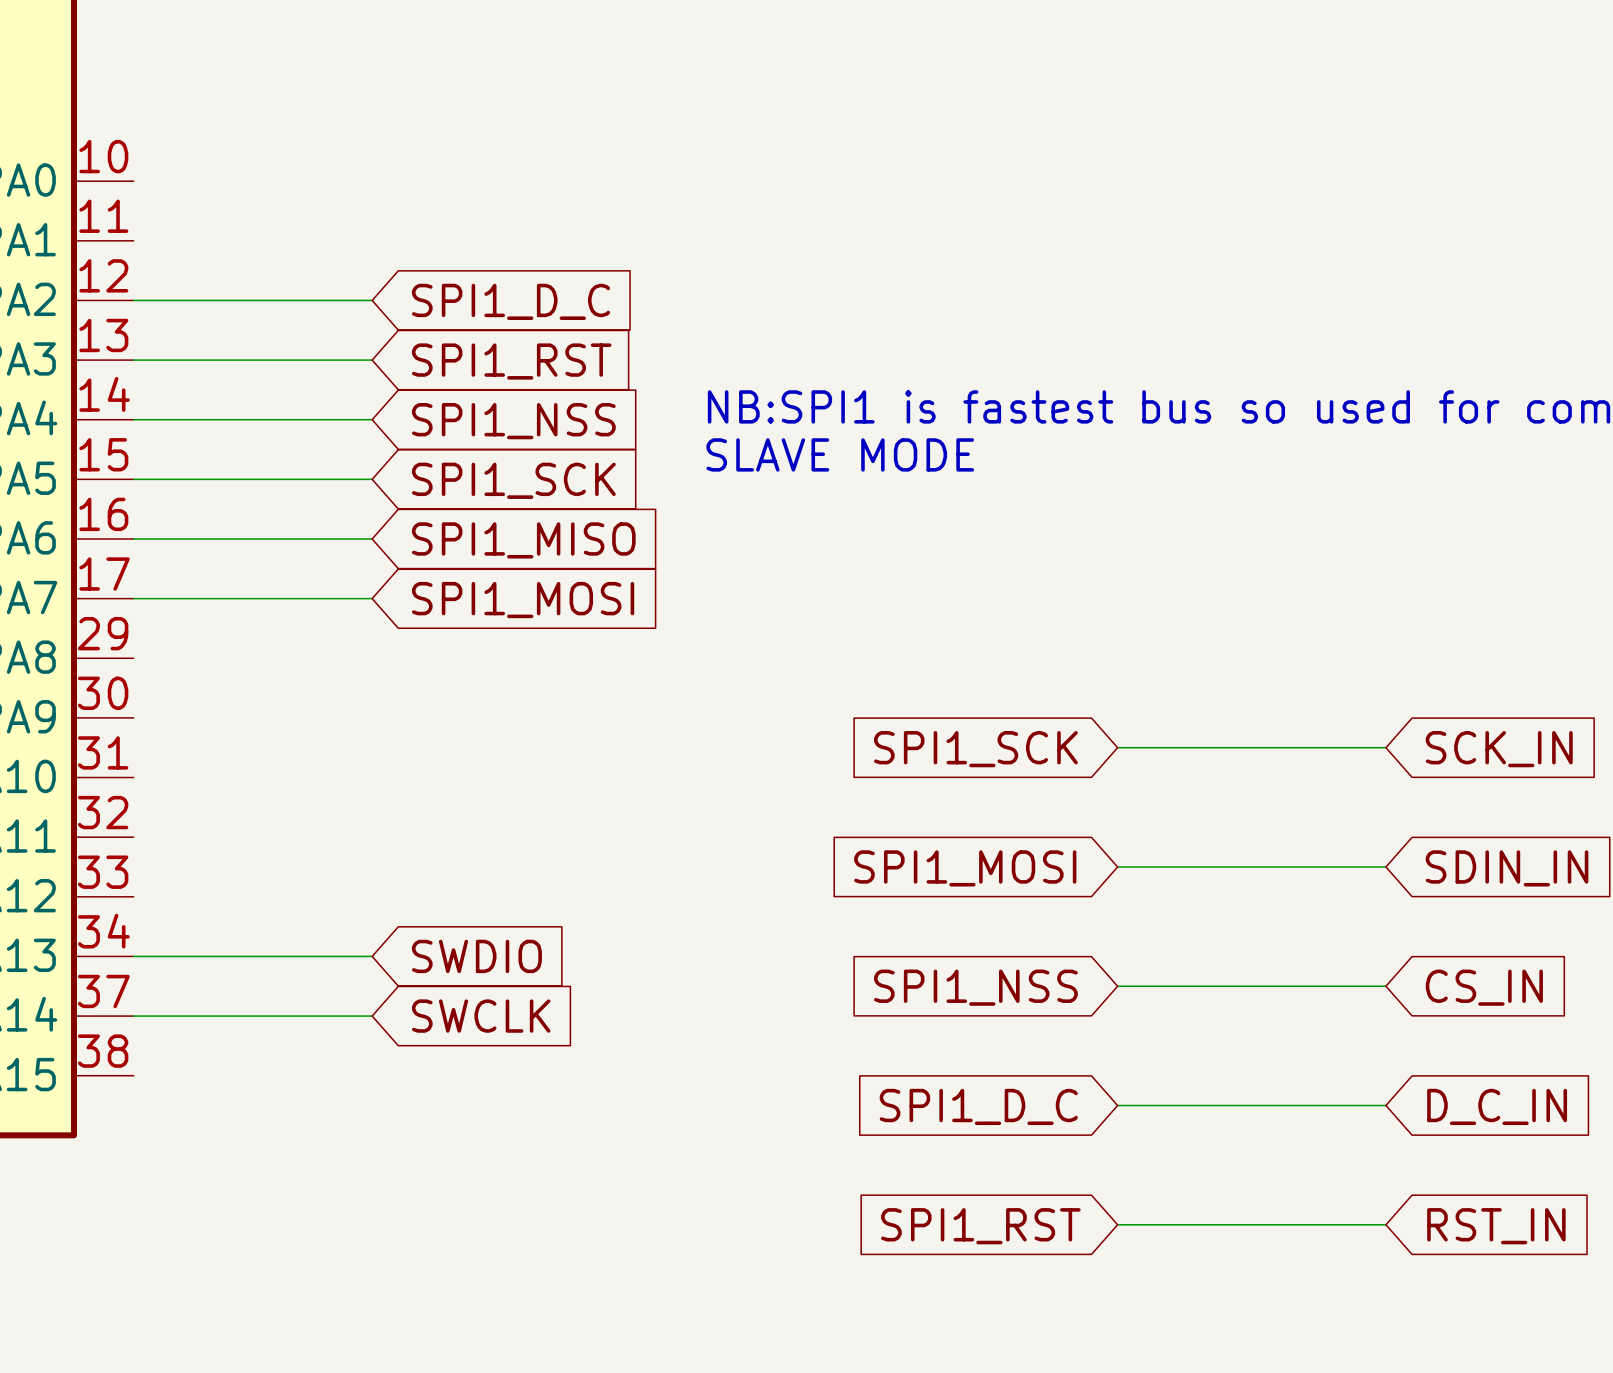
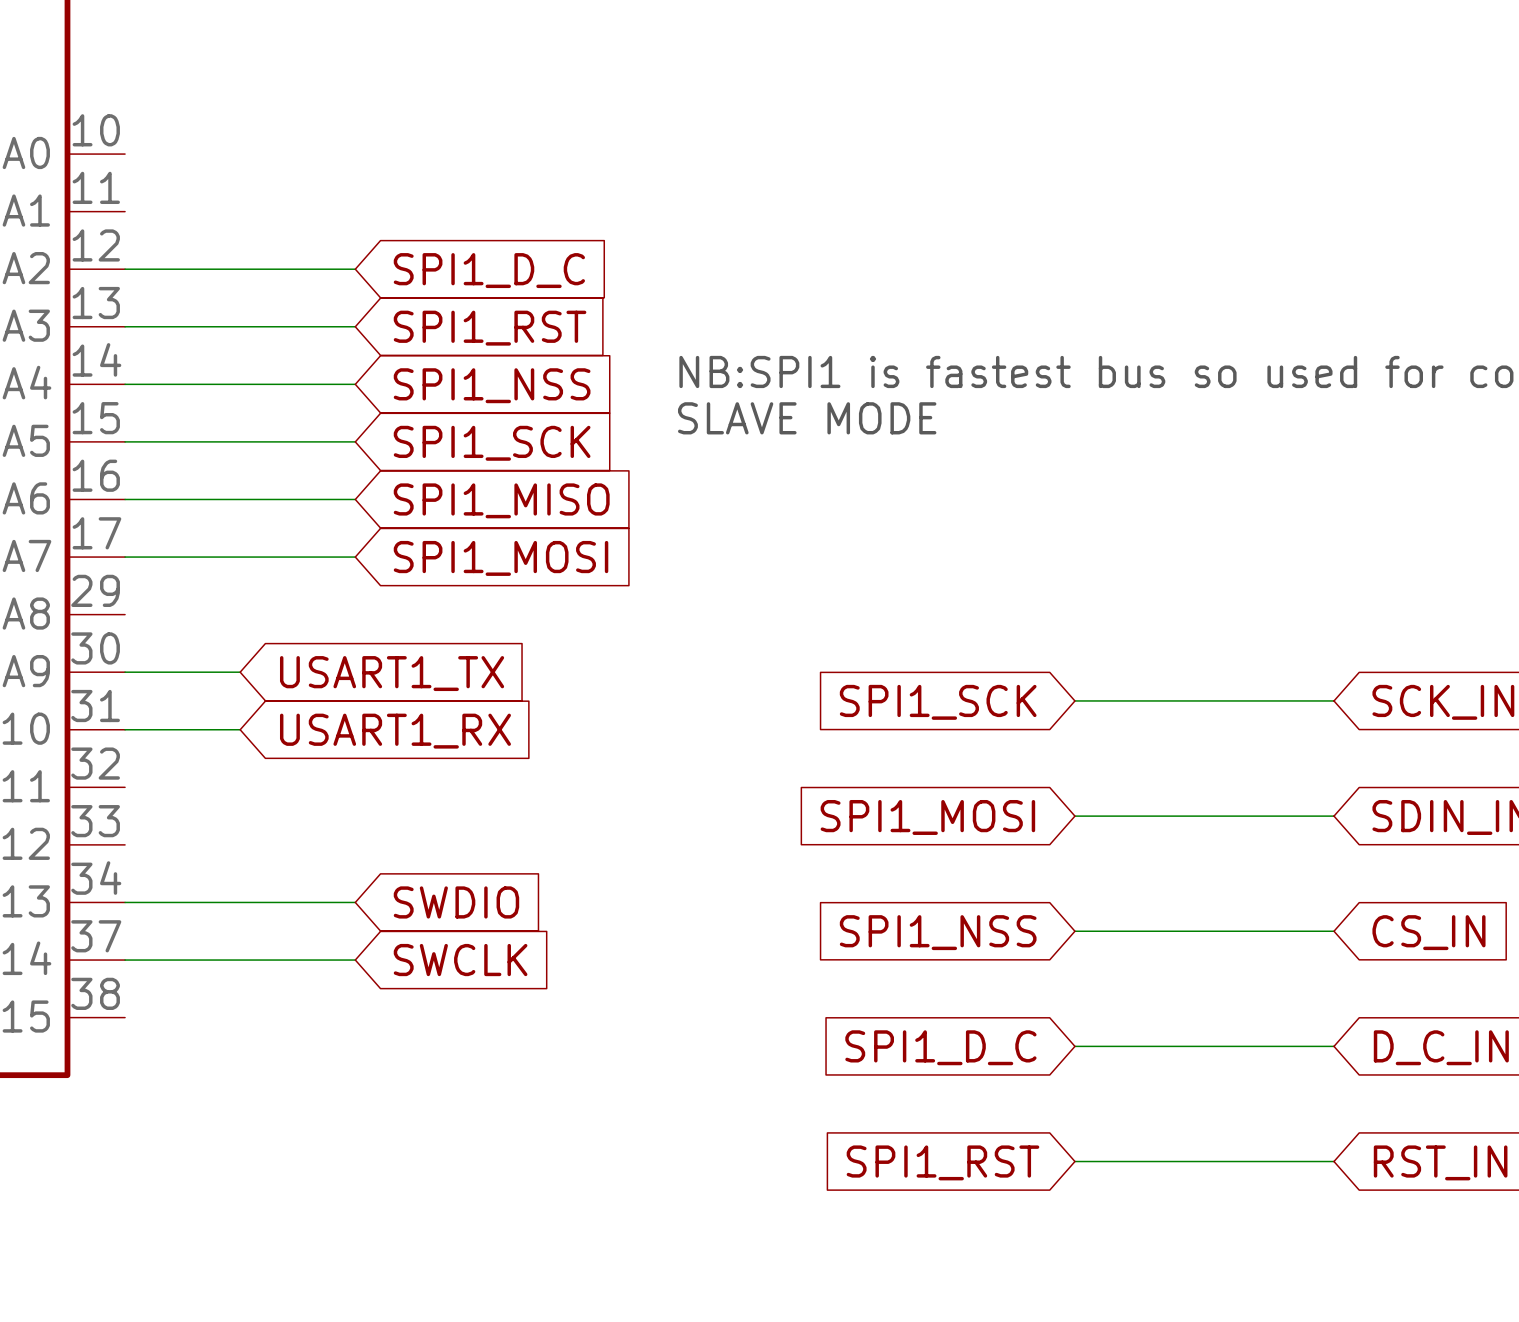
wire: none -> (125, 672) (240, 672)
global label: none -> USART1_TX (392, 673)
wire: none -> (125, 729) (240, 729)
global label: none -> USART1_RX (395, 731)

